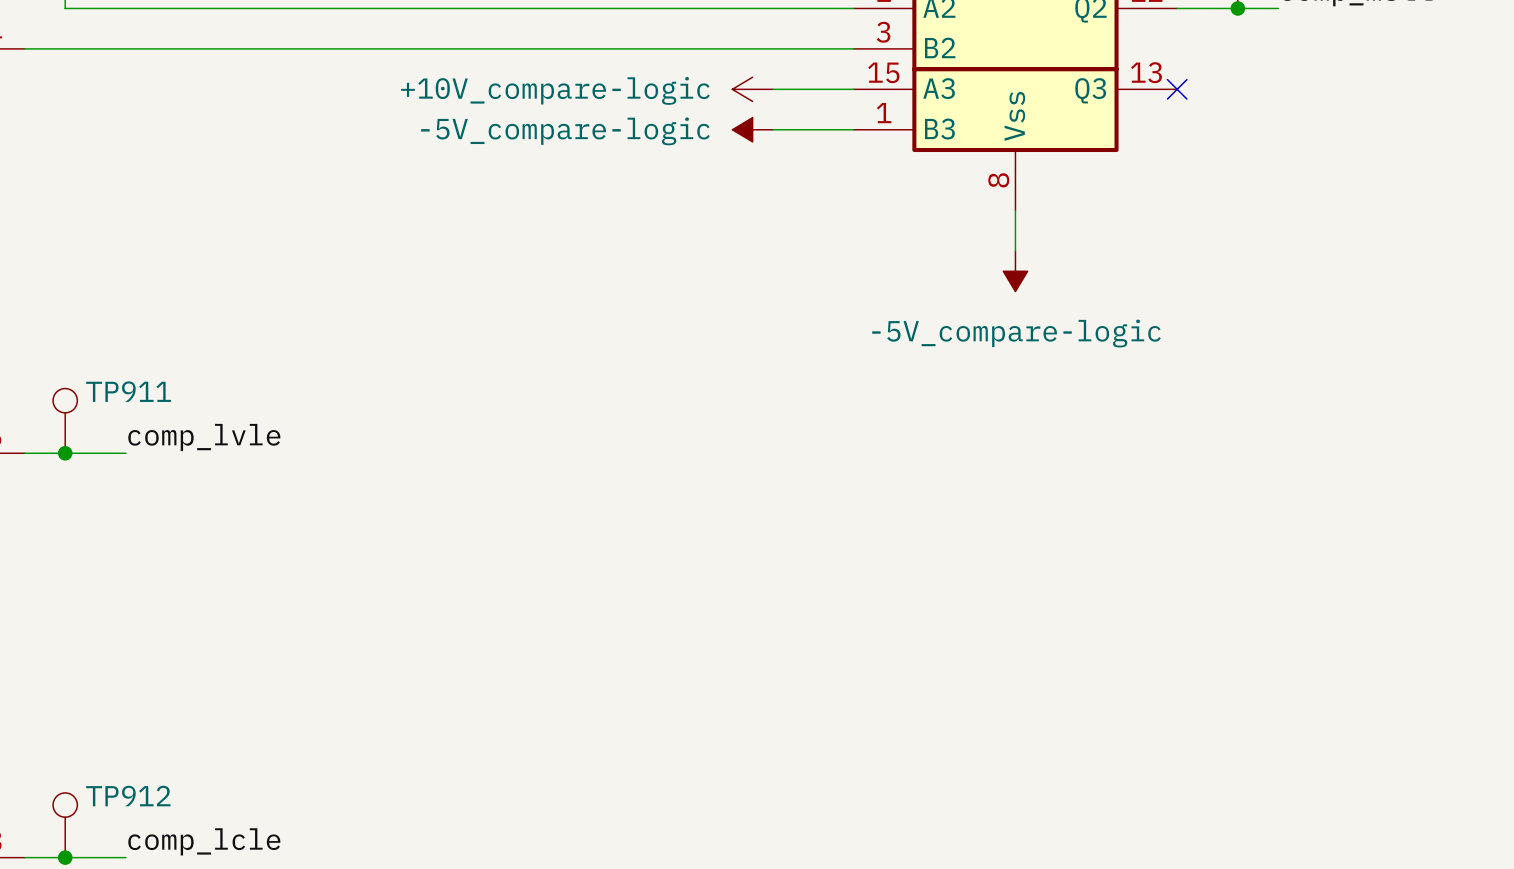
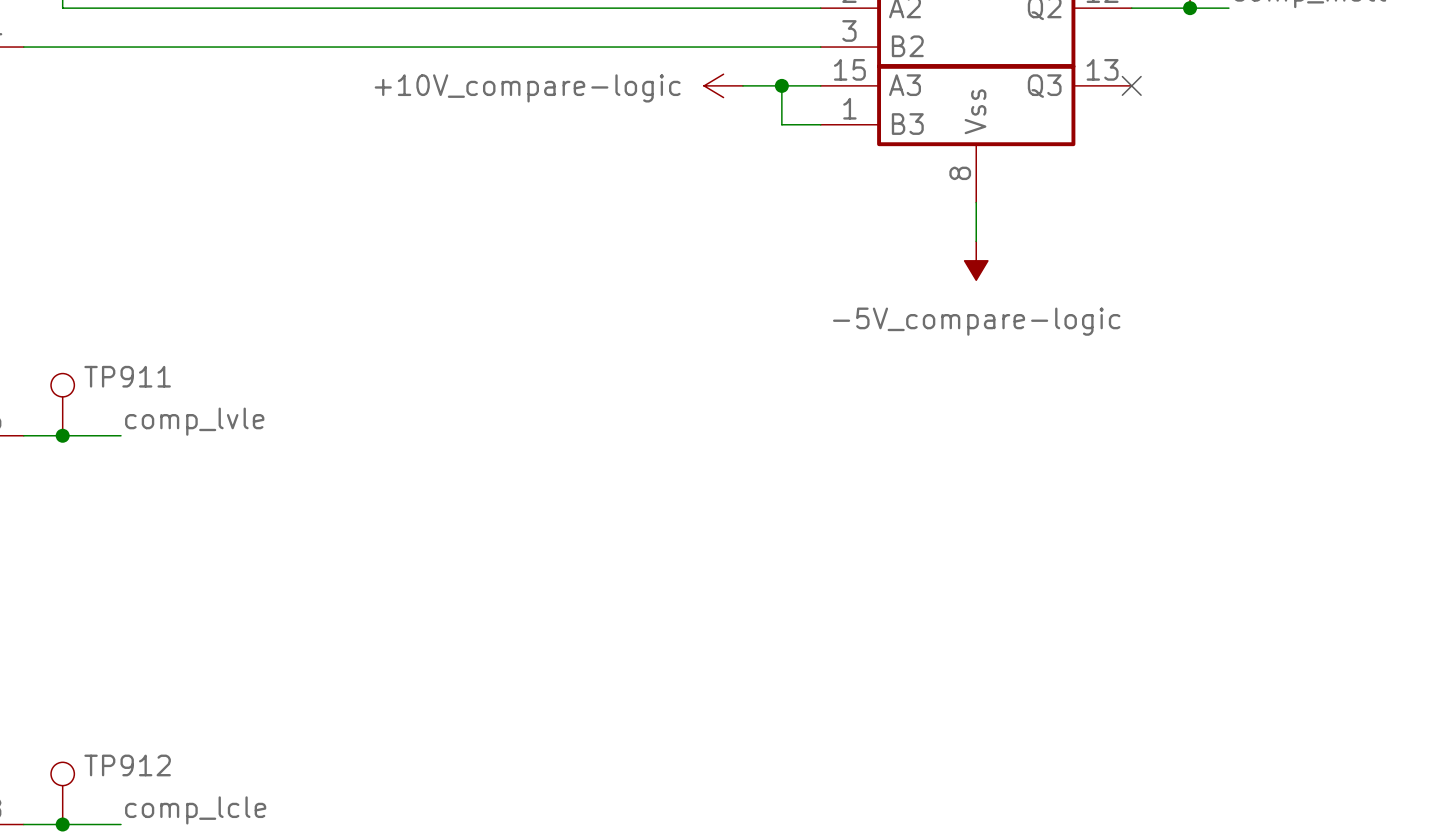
junction: none -> (781, 85)
power symbol: -5V_compare-logic (752, 129) -> none
wire: (772, 129) (813, 129) -> (781, 85) (781, 124)

